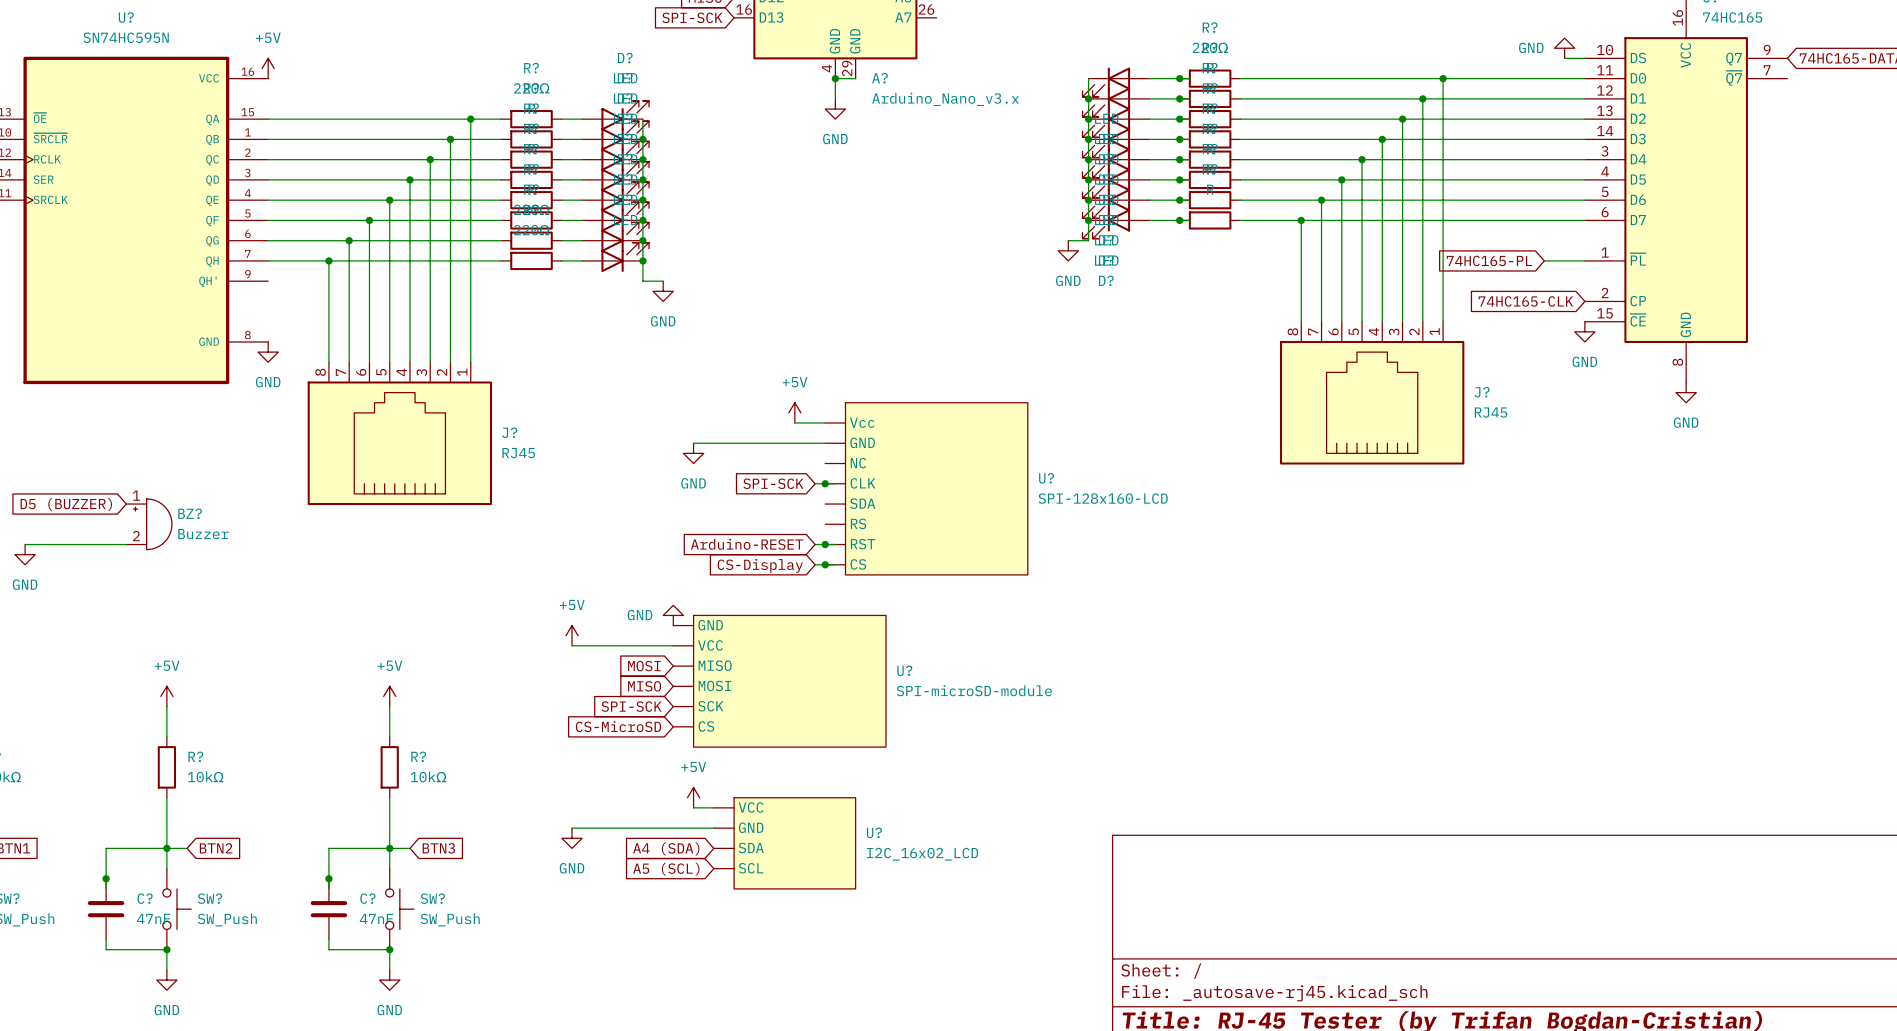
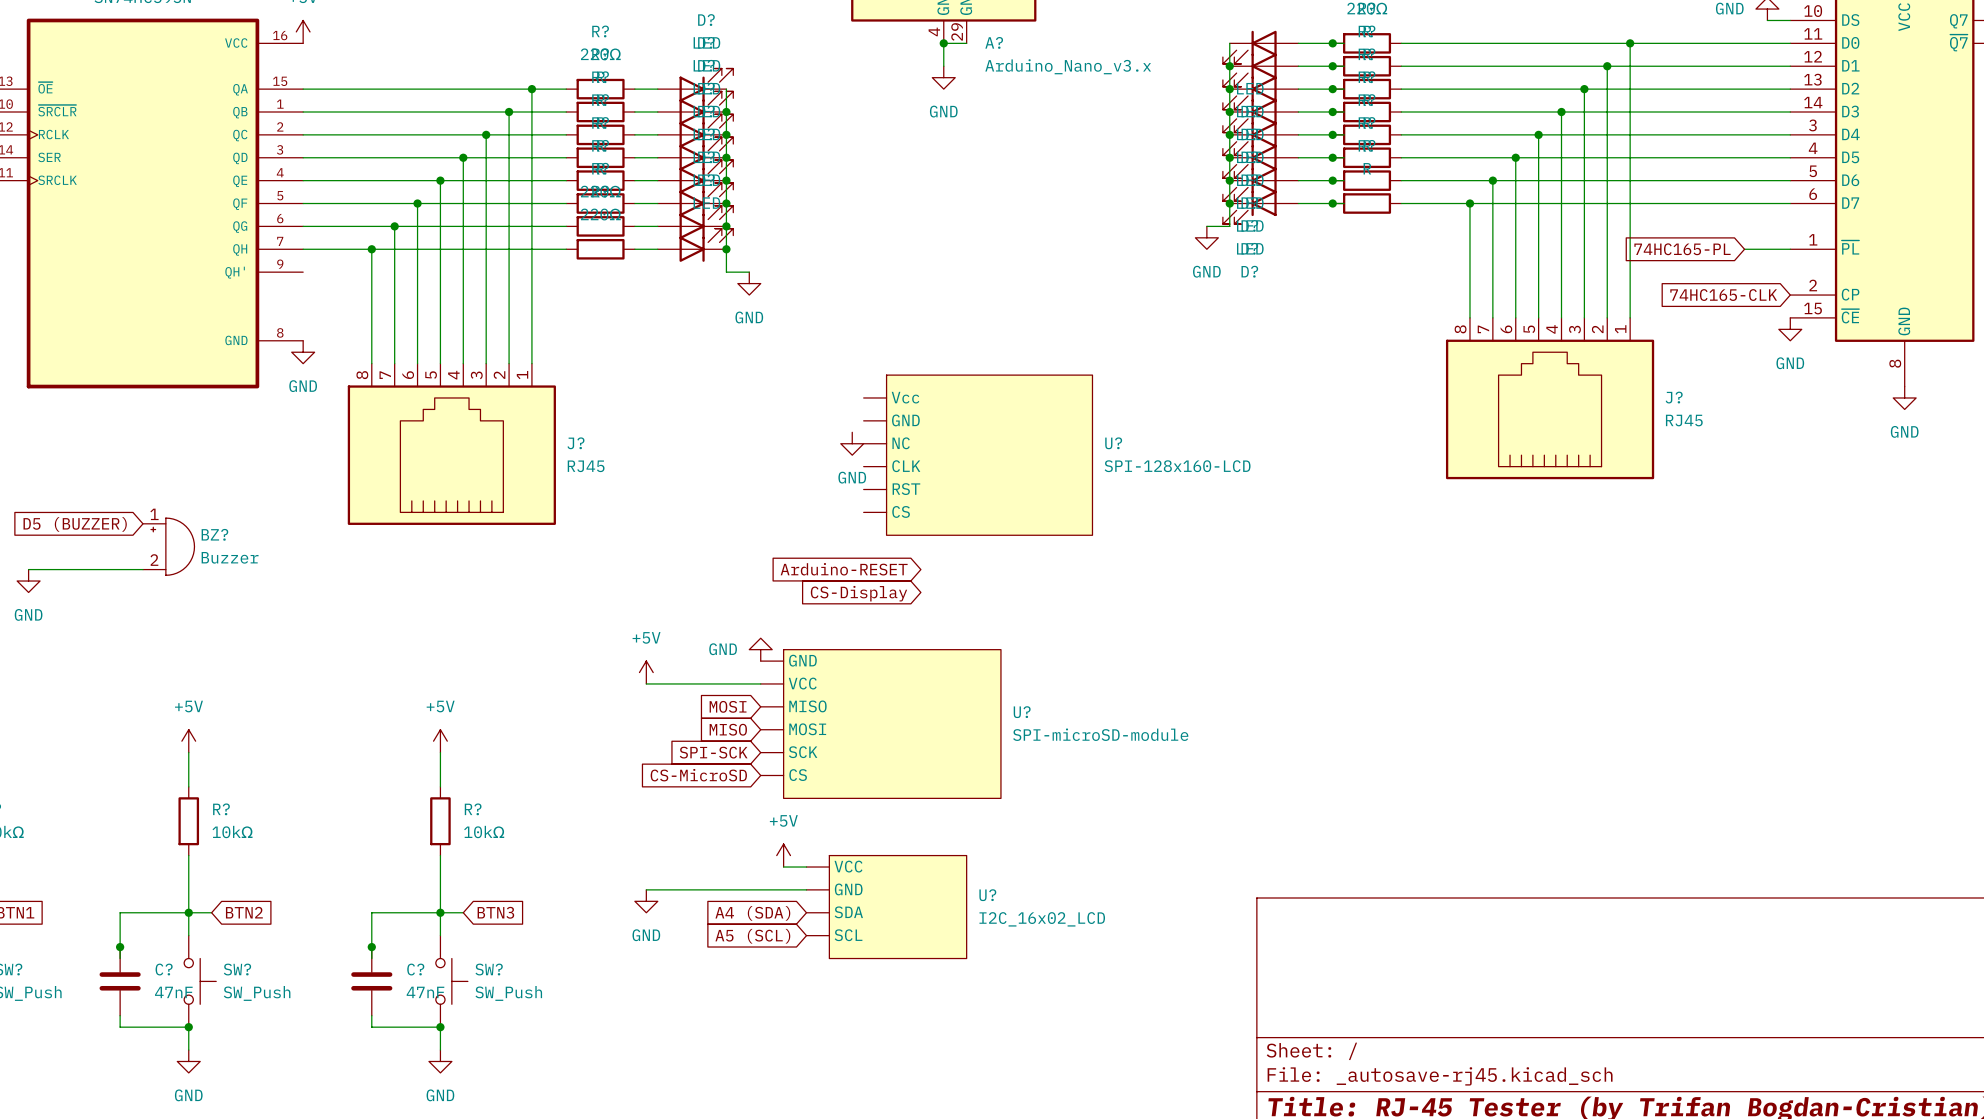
power symbol: +5V (794, 412) -> none
wire: (693, 443) (825, 443) -> none
U?: none -> SPI-128x160-LCD (978, 455)
power symbol position: GND (693, 453) -> GND (852, 443)
global label: SPI-SCK (773, 483) -> none
junction: (825, 483) -> none
U?: SPI-128x160-LCD (926, 488) -> none
wire: (815, 544) (835, 544) -> none
junction: (825, 544) -> none
wire: (815, 564) (835, 564) -> none
junction: (825, 564) -> none

